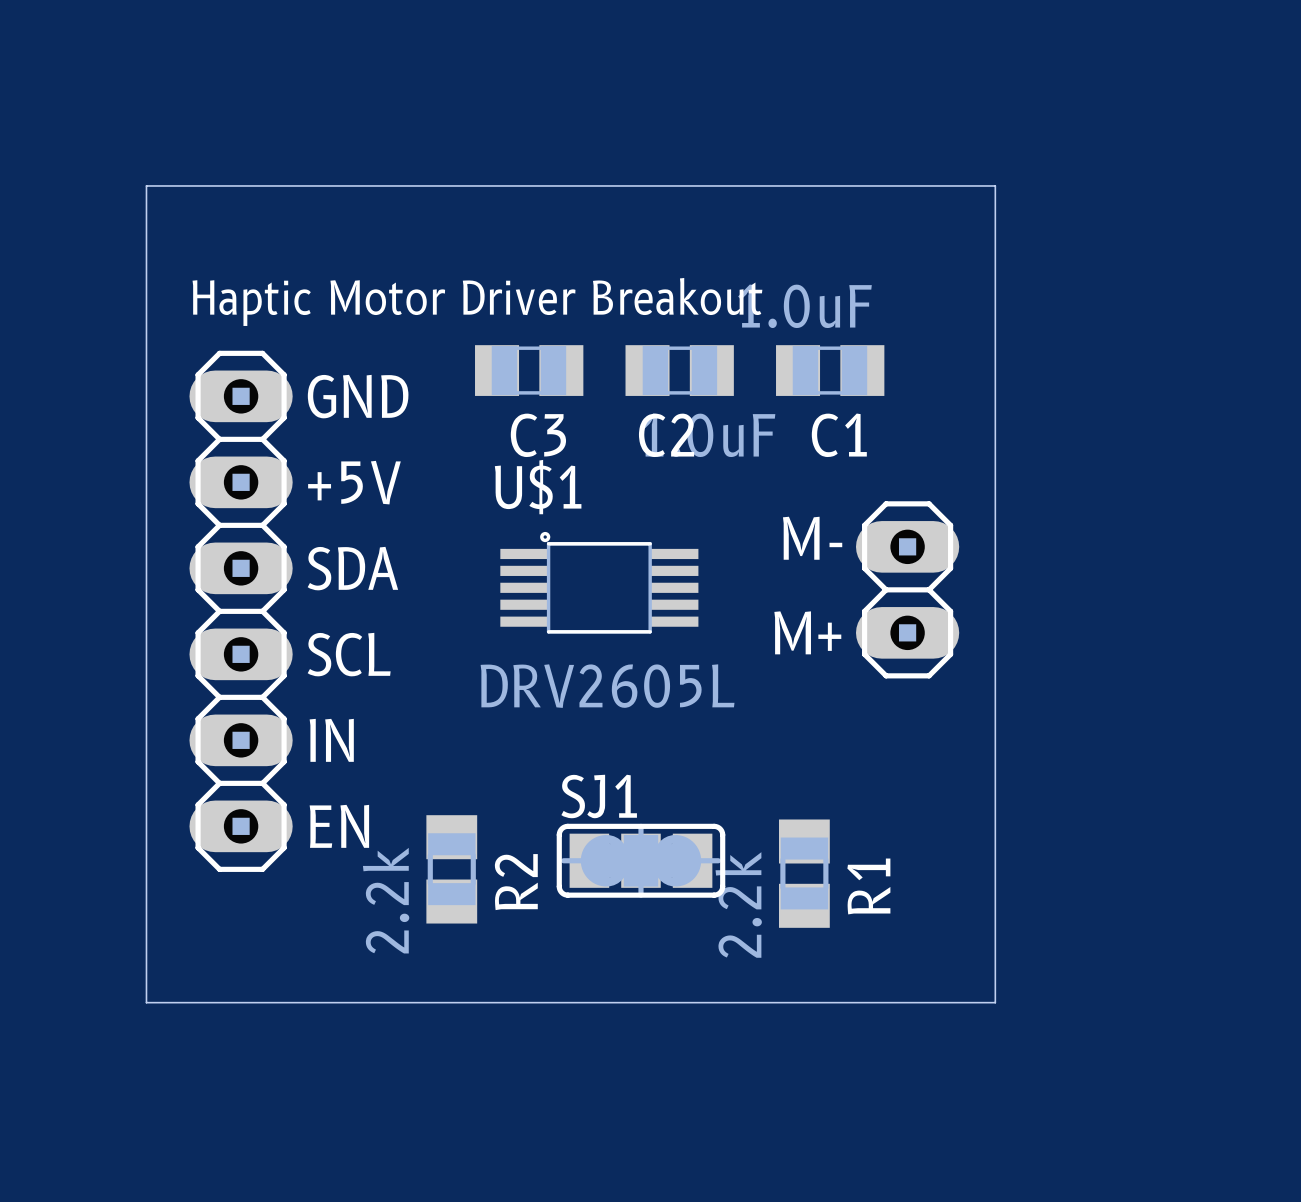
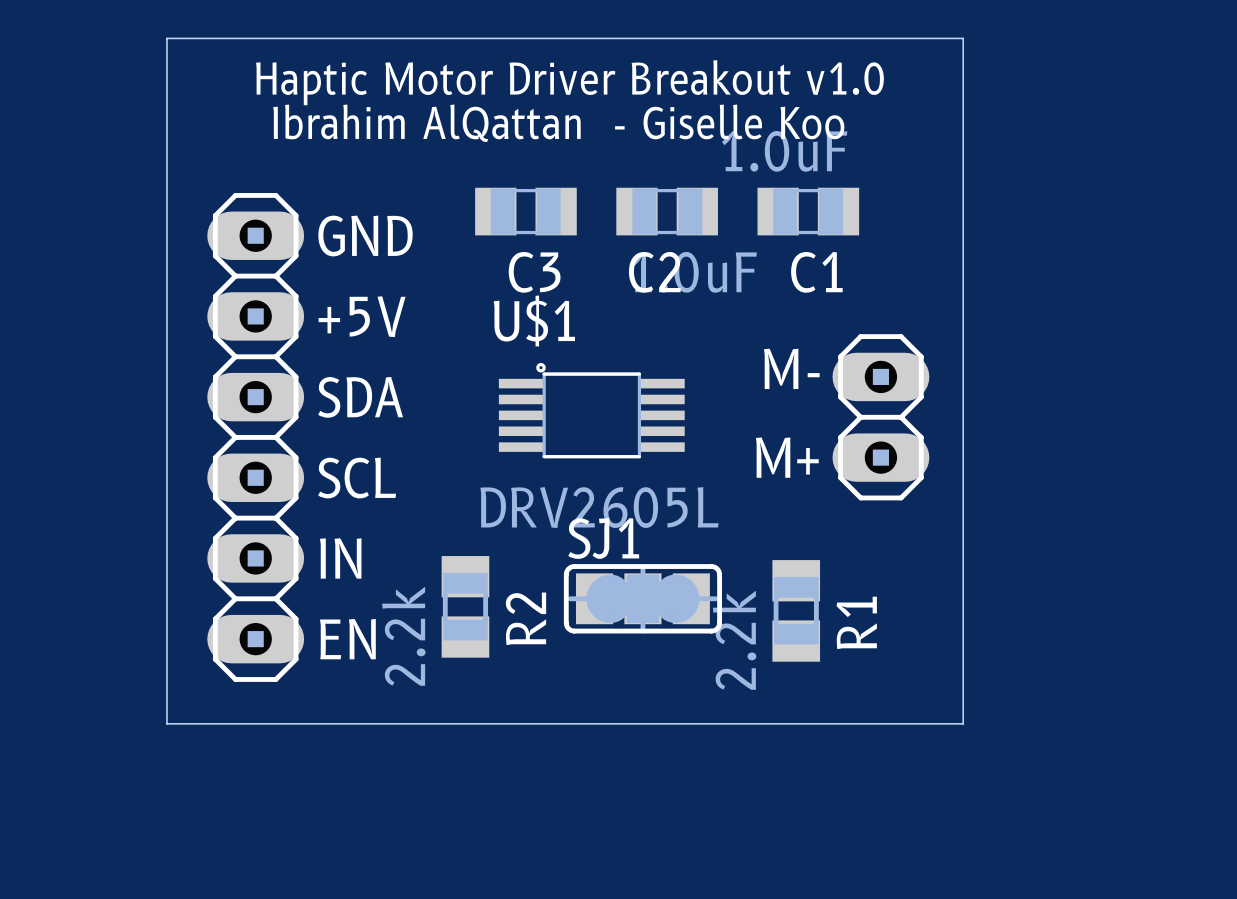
text: none -> Ibrahim AlQattan - Giselle Koo (558, 123)
text: Haptic Motor Driver Breakout (477, 301) -> Haptic Motor Driver Breakout v1.0 (569, 82)
SJ1 position: (640, 860) -> (642, 598)
R2 position: (451, 869) -> (465, 606)
R1 position: (804, 873) -> (796, 610)
board edge: (146, 916) (146, 1002) (995, 1002) (995, 916) -> (166, 723) (963, 723)

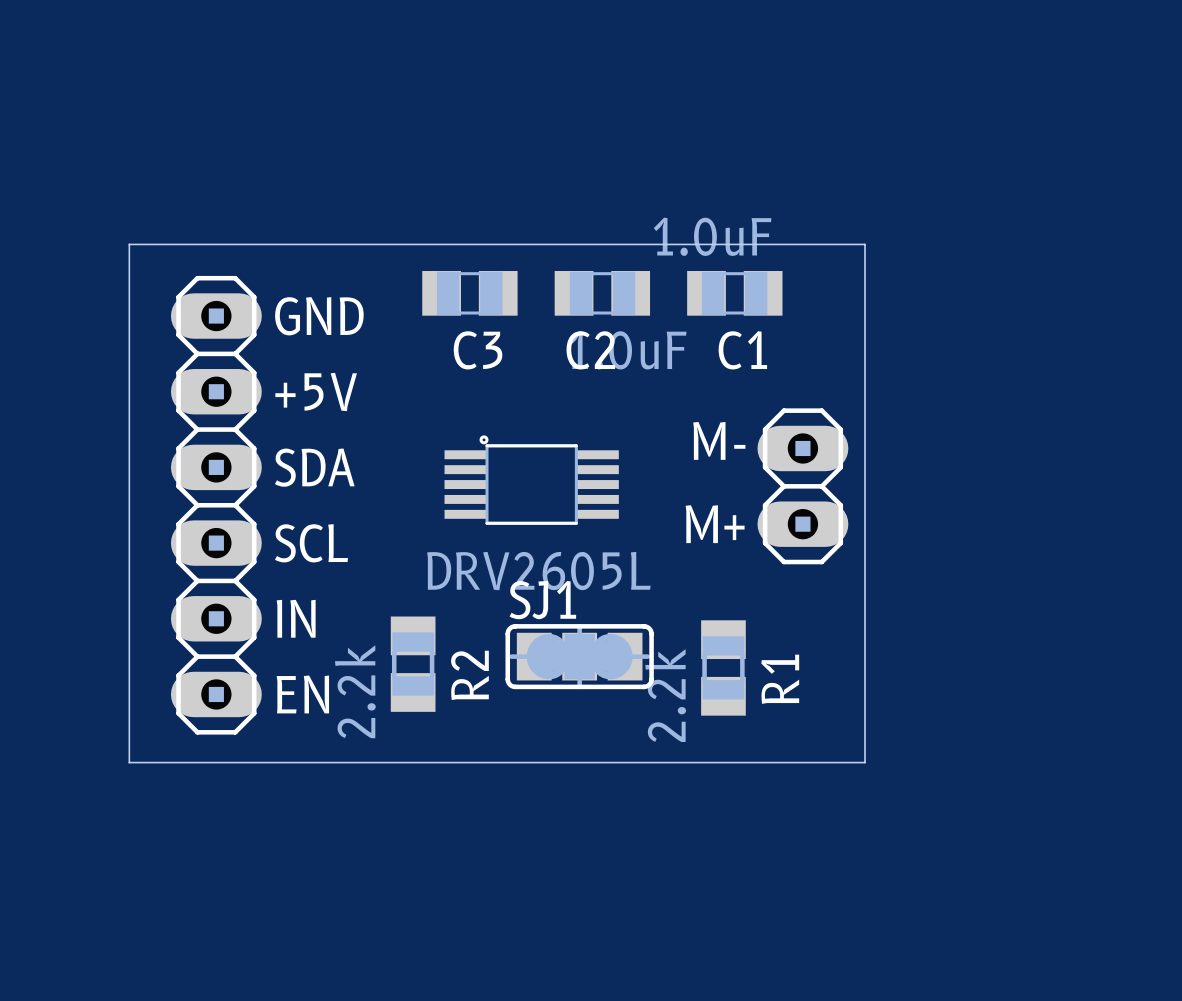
board edge: (166, 38) (963, 38) (963, 723) (166, 723) (166, 38) -> (129, 244) (129, 762) (865, 762) (865, 244) (129, 244)
text: Haptic Motor Driver Breakout v1.0 (569, 82) -> none
text: Ibrahim AlQattan - Giselle Koo (558, 123) -> none
U$1 name: U$1 (534, 320) -> none

